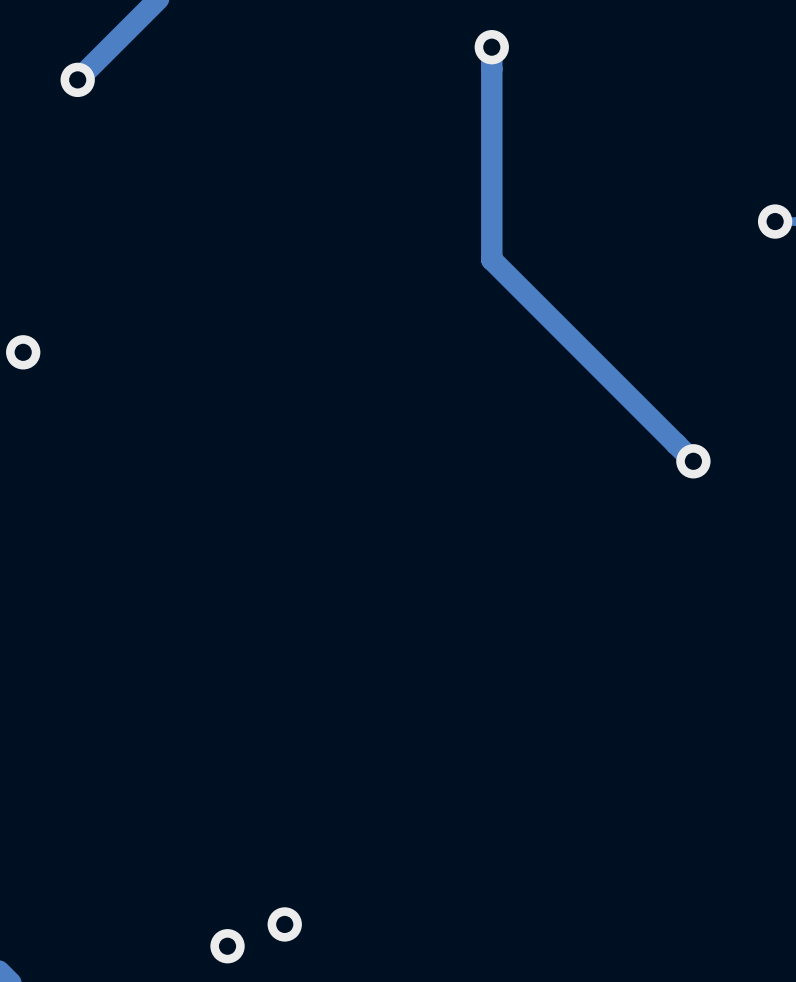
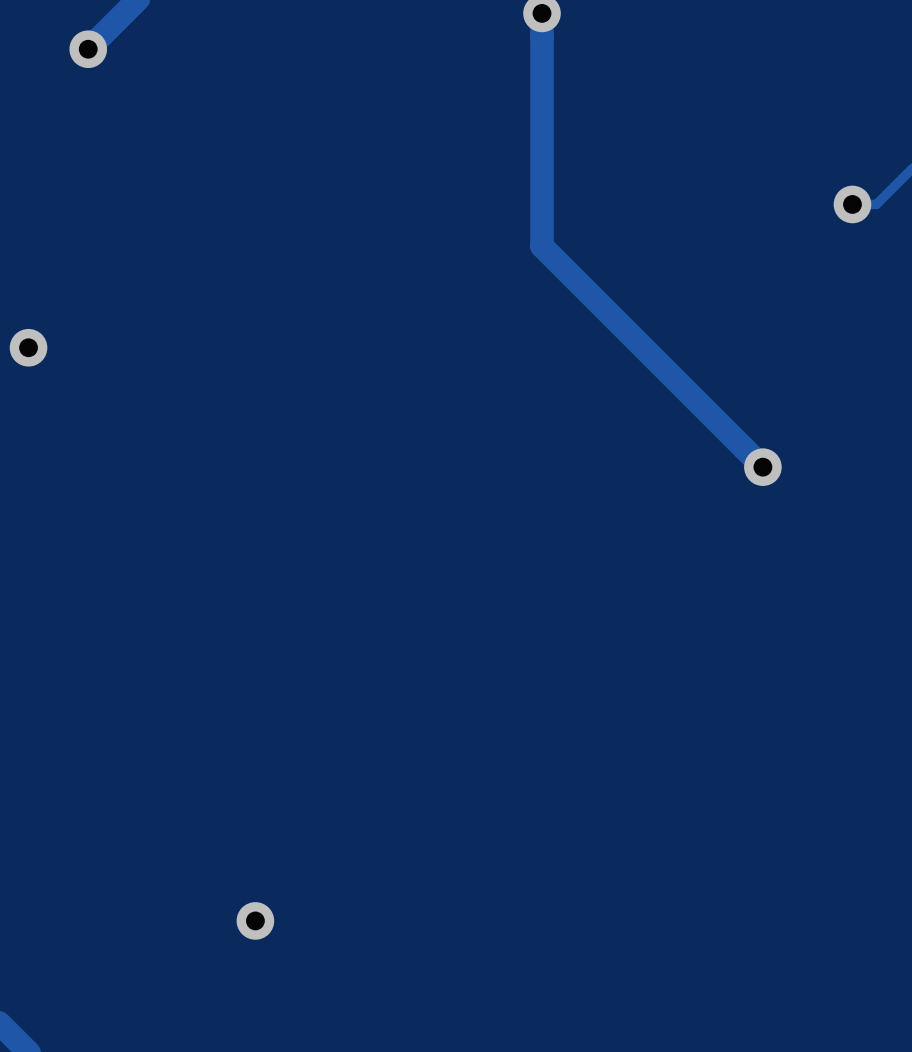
via: none -> (255, 920)
via: (284, 924) -> none
via: (227, 946) -> none

